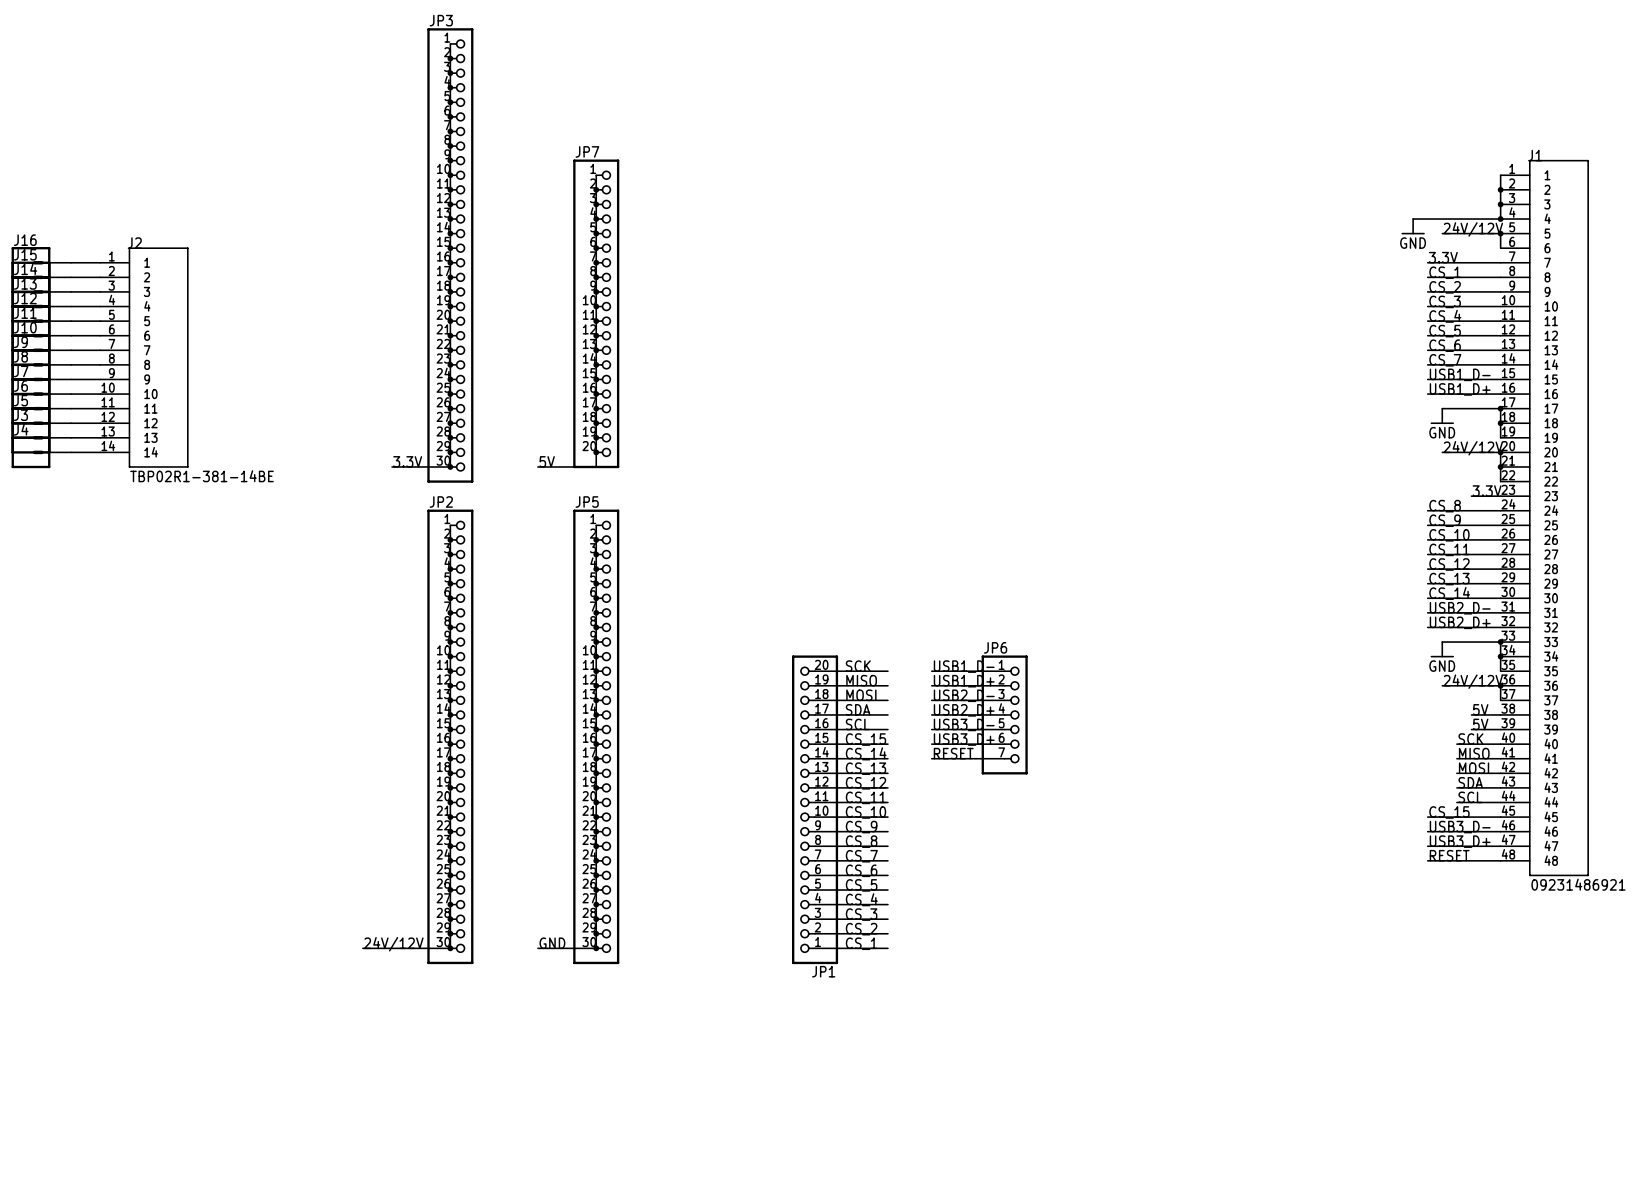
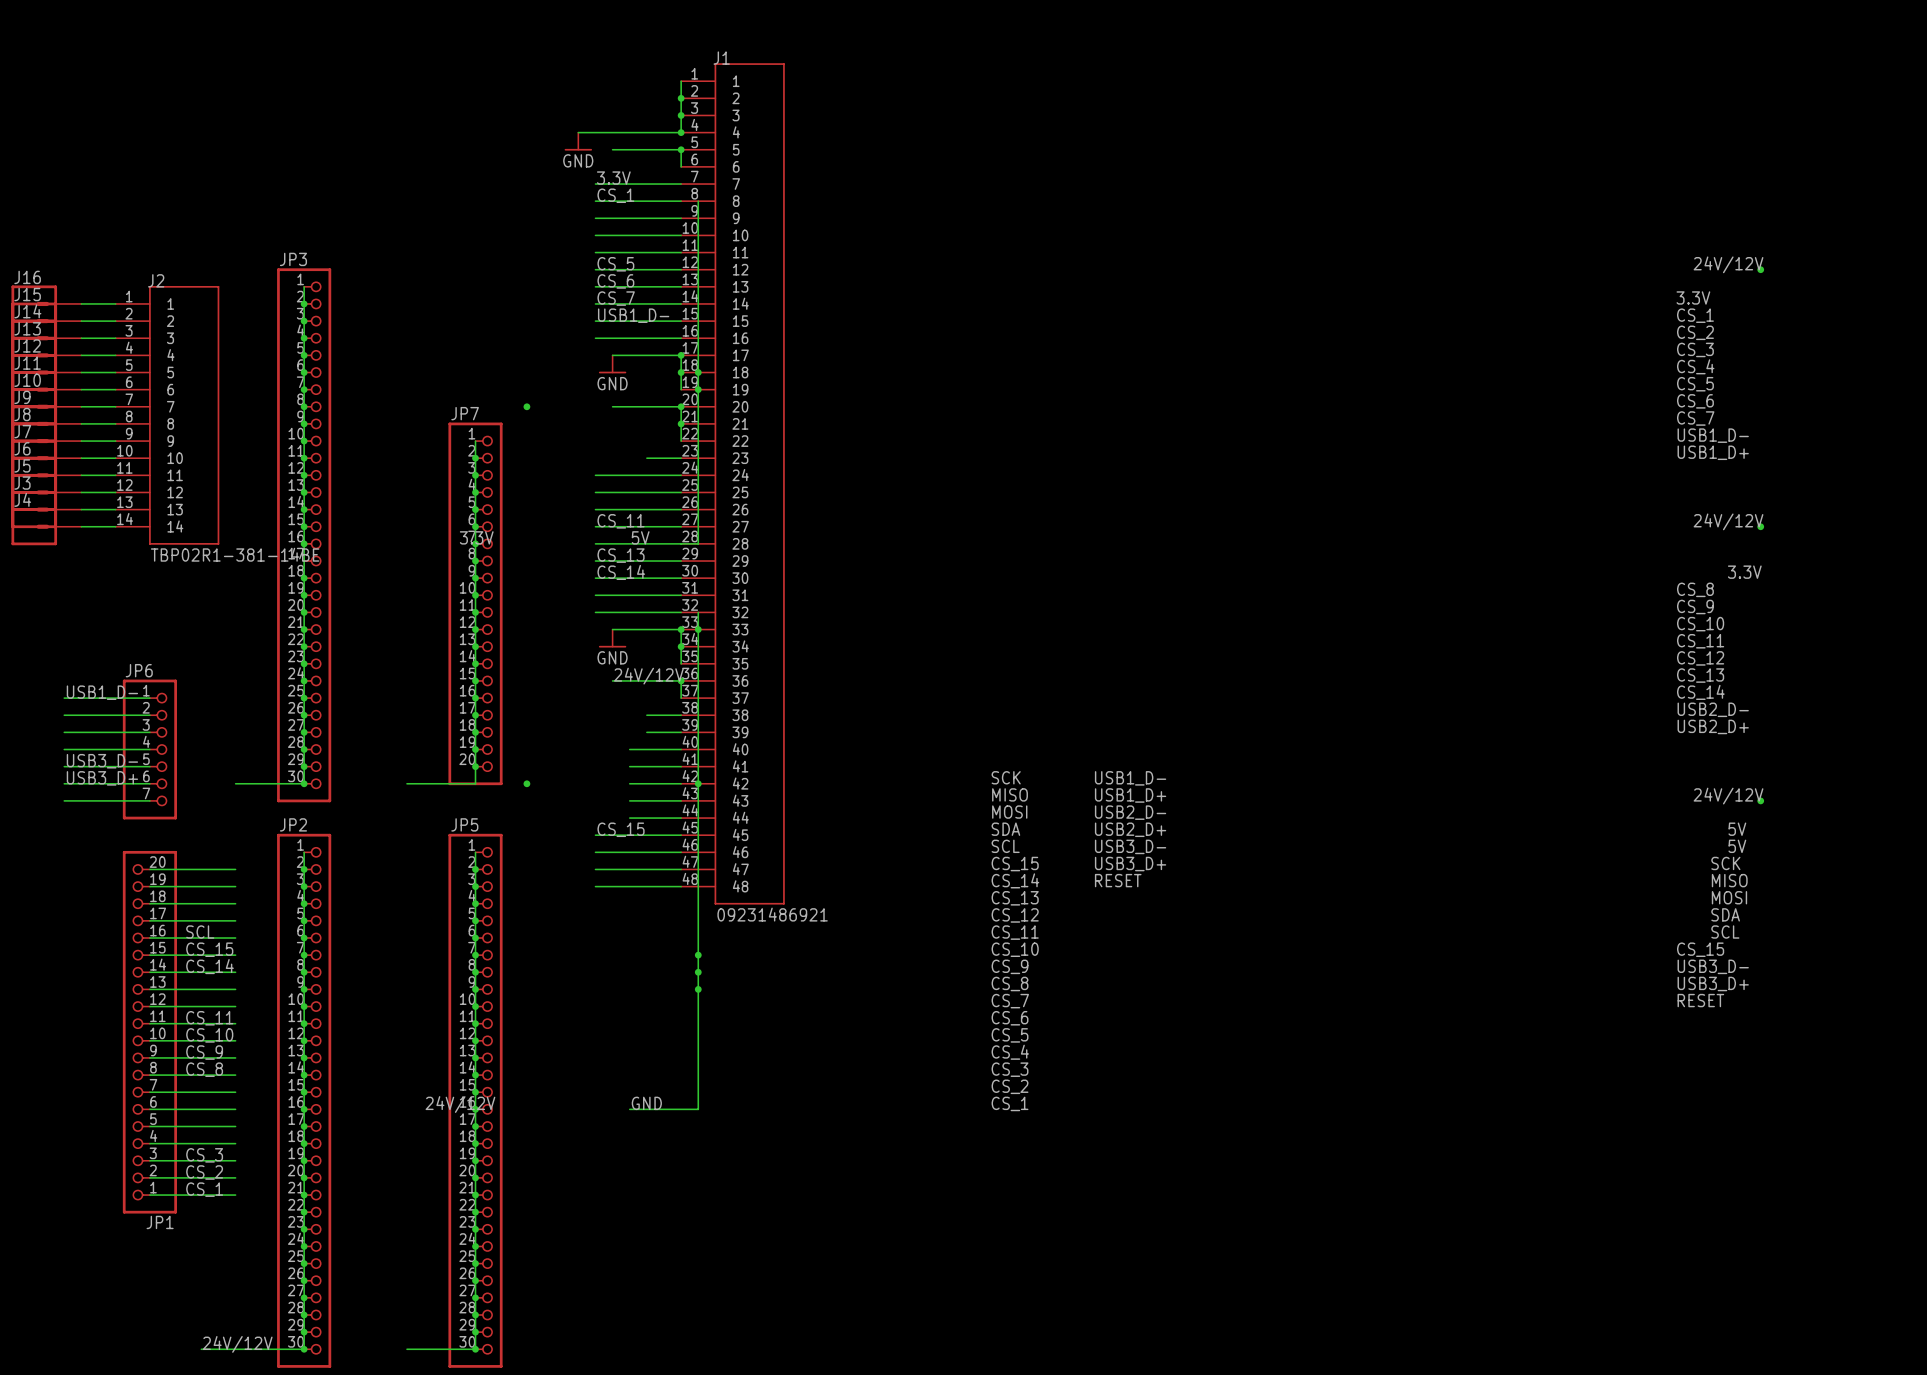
wire: (450, 43) (450, 466) (392, 466) -> none
junction: (450, 58) -> none
junction: (450, 73) -> none
wire: none -> (681, 81) (681, 132) (578, 132)
junction: (450, 87) -> none
junction: none -> (681, 98)
junction: (450, 102) -> none
junction: none -> (681, 115)
junction: (450, 116) -> none
junction: none -> (681, 132)
power symbol: none -> GND (578, 141)
junction: (450, 131) -> none
wire: none -> (612, 149) (681, 149) (681, 166)
junction: none -> (681, 149)
junction: (450, 146) -> none
label: none -> 3.3V (613, 178)
junction: (450, 160) -> none
wire: none -> (595, 184) (681, 184)
label: none -> CS_1 (615, 195)
junction: (450, 175) -> none
wire: none -> (595, 201) (681, 201)
wire: (1500, 175) (1500, 219) (1413, 219) -> none
junction: (450, 189) -> none
wire: none -> (595, 218) (681, 218)
junction: (596, 189) -> none
junction: (1500, 189) -> none
junction: (450, 204) -> none
wire: none -> (595, 235) (681, 235)
junction: (596, 204) -> none
junction: (1500, 204) -> none
junction: (450, 219) -> none
wire: none -> (595, 252) (681, 252)
junction: (596, 219) -> none
junction: (1500, 219) -> none
power symbol: GND (1413, 226) -> none
label: none -> CS_5 (615, 264)
junction: (450, 233) -> none
wire: none -> (595, 269) (681, 269)
junction: (596, 233) -> none
wire: (1442, 233) (1500, 233) (1500, 248) -> none
label: none -> CS_6 (615, 281)
wire: none -> (304, 286) (304, 783) (235, 783)
junction: (450, 248) -> none
wire: none -> (595, 286) (681, 286)
junction: (596, 248) -> none
JP3 position: (450, 255) -> (304, 535)
label: none -> CS_7 (616, 298)
junction: none -> (304, 303)
junction: (450, 262) -> none
wire: none -> (595, 303) (681, 303)
junction: (596, 262) -> none
wire: (1427, 262) (1500, 262) -> none
label: none -> USB1_D- (633, 315)
junction: none -> (304, 321)
junction: (450, 277) -> none
wire: none -> (595, 321) (681, 321)
junction: (596, 277) -> none
wire: (1427, 277) (1500, 277) -> none
junction: none -> (304, 338)
junction: (450, 291) -> none
wire: none -> (595, 338) (681, 338)
junction: (596, 291) -> none
wire: (1427, 291) (1500, 291) -> none
junction: none -> (304, 355)
junction: (450, 306) -> none
wire: none -> (612, 355) (681, 355) (681, 389)
junction: none -> (681, 355)
junction: (596, 306) -> none
wire: (1427, 306) (1500, 306) -> none
JP7 position: (596, 313) -> (475, 603)
power symbol: none -> GND (612, 364)
junction: none -> (304, 372)
junction: (450, 321) -> none
junction: none -> (681, 372)
wire: (1427, 321) (1500, 321) -> none
junction: none -> (304, 389)
junction: (450, 335) -> none
wire: (1427, 335) (1500, 335) -> none
junction: none -> (304, 406)
wire: none -> (612, 406) (681, 406) (681, 441)
junction: none -> (681, 406)
junction: (596, 350) -> none
wire: (1427, 350) (1500, 350) -> none
junction: none -> (304, 423)
junction: (450, 364) -> none
junction: none -> (681, 423)
junction: (596, 364) -> none
wire: (1427, 364) (1500, 364) -> none
junction: none -> (304, 441)
wire: none -> (475, 441) (475, 783) (406, 783)
junction: (450, 379) -> none
junction: (596, 379) -> none
wire: (1427, 379) (1500, 379) -> none
junction: none -> (304, 458)
junction: none -> (475, 458)
junction: (450, 394) -> none
wire: none -> (646, 458) (681, 458)
junction: (596, 394) -> none
wire: (1427, 394) (1500, 394) -> none
junction: none -> (304, 475)
junction: none -> (475, 475)
junction: (450, 408) -> none
wire: none -> (595, 475) (681, 475)
junction: (596, 408) -> none
wire: (1442, 408) (1500, 408) (1500, 437) -> none
junction: (1500, 408) -> none
power symbol: GND (1442, 416) -> none
junction: none -> (304, 492)
junction: none -> (475, 492)
junction: (450, 423) -> none
wire: none -> (595, 492) (681, 492)
junction: (596, 423) -> none
junction: (1500, 423) -> none
junction: none -> (304, 509)
junction: none -> (475, 509)
junction: (450, 437) -> none
wire: none -> (595, 509) (681, 509)
junction: (596, 437) -> none
label: none -> CS_11 (621, 521)
junction: none -> (304, 526)
junction: none -> (475, 526)
junction: (450, 452) -> none
wire: none -> (595, 526) (681, 526)
junction: (596, 452) -> none
wire: (1442, 452) (1500, 452) (1500, 481) -> none
junction: none -> (304, 543)
junction: none -> (475, 543)
junction: (450, 466) -> none
wire: none -> (595, 543) (629, 543)
junction: (1500, 466) -> none
label: none -> CS_13 (621, 555)
junction: none -> (475, 561)
wire: none -> (595, 561) (681, 561)
label: none -> CS_14 (621, 572)
junction: none -> (304, 578)
junction: none -> (475, 578)
wire: none -> (595, 578) (681, 578)
wire: (1471, 496) (1500, 496) -> none
junction: none -> (304, 595)
junction: none -> (475, 595)
wire: none -> (595, 595) (681, 595)
wire: (1427, 510) (1500, 510) -> none
J1 position: (1544, 518) -> (732, 483)
junction: none -> (304, 612)
junction: none -> (475, 612)
wire: (450, 525) (450, 948) (362, 948) -> none
wire: none -> (595, 612) (681, 612)
wire: (1427, 525) (1500, 525) -> none
junction: none -> (304, 629)
junction: none -> (475, 629)
junction: (450, 539) -> none
wire: none -> (612, 629) (681, 629) (681, 663)
junction: none -> (681, 629)
wire: (1427, 539) (1500, 539) -> none
power symbol: none -> GND (612, 638)
junction: none -> (304, 646)
junction: none -> (475, 646)
junction: (450, 554) -> none
junction: none -> (681, 646)
junction: (596, 554) -> none
wire: (1427, 554) (1500, 554) -> none
junction: none -> (304, 663)
junction: none -> (475, 663)
junction: (450, 569) -> none
junction: (596, 569) -> none
wire: (1427, 569) (1500, 569) -> none
label: none -> 24V/12V (648, 676)
junction: none -> (304, 680)
junction: none -> (475, 680)
junction: (450, 583) -> none
wire: none -> (612, 680) (681, 680) (681, 698)
junction: none -> (681, 680)
junction: (596, 583) -> none
wire: (1427, 583) (1500, 583) -> none
label: none -> USB1_D- (102, 692)
wire: none -> (64, 698) (149, 698)
junction: none -> (304, 698)
junction: none -> (475, 698)
junction: (450, 598) -> none
junction: (596, 598) -> none
wire: (1427, 598) (1500, 598) -> none
wire: none -> (64, 715) (149, 715)
junction: none -> (304, 715)
junction: none -> (475, 715)
junction: (450, 612) -> none
wire: none -> (646, 715) (681, 715)
junction: (596, 612) -> none
wire: (1427, 612) (1500, 612) -> none
wire: none -> (64, 732) (149, 732)
junction: none -> (304, 732)
junction: none -> (475, 732)
junction: (450, 627) -> none
wire: none -> (646, 732) (681, 732)
junction: (596, 627) -> none
wire: (1427, 627) (1500, 627) -> none
wire: none -> (64, 749) (149, 749)
junction: none -> (304, 749)
junction: none -> (475, 749)
junction: (450, 642) -> none
wire: none -> (629, 749) (681, 749)
junction: (596, 642) -> none
wire: (1442, 642) (1500, 642) (1500, 671) -> none
junction: (1500, 642) -> none
power symbol: GND (1442, 649) -> none
label: none -> USB3_D- (102, 761)
wire: none -> (64, 766) (149, 766)
junction: none -> (304, 766)
junction: none -> (475, 766)
junction: (450, 656) -> none
wire: none -> (629, 766) (681, 766)
junction: (596, 656) -> none
junction: (1500, 656) -> none
label: none -> USB3_D+ (102, 778)
wire: none -> (64, 783) (149, 783)
junction: none -> (304, 783)
wire: none -> (629, 783) (681, 783)
wire: (815, 671) (887, 671) -> none
wire: (931, 671) (1004, 671) -> none
wire: none -> (64, 800) (149, 800)
junction: (450, 685) -> none
wire: none -> (629, 800) (681, 800)
junction: (596, 685) -> none
wire: (815, 685) (887, 685) -> none
wire: (931, 685) (1004, 685) -> none
wire: (1442, 685) (1500, 685) (1500, 700) -> none
junction: (450, 700) -> none
wire: none -> (629, 818) (681, 818)
junction: (596, 700) -> none
wire: (815, 700) (887, 700) -> none
wire: (931, 700) (1004, 700) -> none
label: none -> CS_15 (621, 829)
junction: (450, 714) -> none
wire: none -> (595, 835) (681, 835)
junction: (596, 714) -> none
wire: (815, 714) (887, 714) -> none
wire: (931, 714) (1004, 714) -> none
JP6 position: (1004, 714) -> (149, 749)
wire: (1471, 714) (1500, 714) -> none
wire: none -> (304, 852) (304, 1349) (201, 1349)
wire: none -> (475, 852) (475, 1349) (406, 1349)
junction: (450, 729) -> none
wire: none -> (595, 852) (681, 852)
junction: (596, 729) -> none
wire: (815, 729) (887, 729) -> none
wire: (931, 729) (1004, 729) -> none
wire: (1471, 729) (1500, 729) -> none
JP2 position: (450, 736) -> (304, 1100)
JP5 position: (596, 736) -> (475, 1100)
wire: none -> (149, 869) (235, 869)
junction: none -> (304, 869)
junction: none -> (475, 869)
junction: (450, 744) -> none
wire: none -> (595, 869) (681, 869)
junction: (596, 744) -> none
wire: (815, 744) (887, 744) -> none
wire: (931, 744) (1004, 744) -> none
wire: (1456, 744) (1500, 744) -> none
wire: none -> (149, 886) (235, 886)
junction: none -> (304, 886)
junction: none -> (475, 886)
junction: (450, 758) -> none
wire: none -> (595, 886) (681, 886)
junction: (596, 758) -> none
wire: (815, 758) (887, 758) -> none
wire: (931, 758) (1004, 758) -> none
wire: (1456, 758) (1500, 758) -> none
wire: none -> (149, 903) (235, 903)
junction: none -> (304, 903)
junction: none -> (475, 903)
junction: (450, 773) -> none
junction: (596, 773) -> none
wire: (815, 773) (887, 773) -> none
wire: (1456, 773) (1500, 773) -> none
wire: none -> (149, 920) (235, 920)
junction: none -> (304, 920)
junction: none -> (475, 920)
junction: (450, 787) -> none
junction: (596, 787) -> none
wire: (815, 787) (887, 787) -> none
wire: (1456, 787) (1500, 787) -> none
label: none -> SCL (200, 932)
wire: none -> (149, 938) (235, 938)
junction: none -> (304, 938)
junction: none -> (475, 938)
junction: (450, 802) -> none
junction: (596, 802) -> none
wire: (815, 802) (887, 802) -> none
wire: (1456, 802) (1500, 802) -> none
JP1 position: (815, 809) -> (149, 1032)
label: none -> CS_15 (209, 949)
wire: none -> (149, 955) (235, 955)
junction: none -> (304, 955)
junction: none -> (475, 955)
junction: (450, 817) -> none
wire: (815, 817) (887, 817) -> none
wire: (1427, 817) (1500, 817) -> none
label: none -> CS_14 (210, 966)
wire: none -> (149, 972) (235, 972)
junction: none -> (304, 972)
junction: none -> (475, 972)
junction: (450, 831) -> none
wire: (815, 831) (887, 831) -> none
wire: (1427, 831) (1500, 831) -> none
wire: none -> (149, 989) (235, 989)
junction: none -> (304, 989)
junction: none -> (475, 989)
junction: (450, 846) -> none
wire: (815, 846) (887, 846) -> none
wire: (1427, 846) (1500, 846) -> none
wire: none -> (149, 1006) (235, 1006)
junction: none -> (304, 1006)
junction: none -> (475, 1006)
junction: (450, 860) -> none
junction: (596, 860) -> none
wire: (815, 860) (887, 860) -> none
wire: (1427, 860) (1500, 860) -> none
label: none -> CS_11 (209, 1018)
wire: none -> (149, 1023) (235, 1023)
junction: none -> (304, 1023)
junction: none -> (475, 1023)
junction: (450, 875) -> none
junction: (596, 875) -> none
wire: (815, 875) (887, 875) -> none
label: none -> CS_10 (209, 1035)
wire: none -> (149, 1040) (235, 1040)
junction: none -> (304, 1040)
junction: none -> (475, 1040)
junction: (450, 890) -> none
junction: (596, 890) -> none
wire: (815, 890) (887, 890) -> none
label: none -> CS_9 (204, 1052)
wire: none -> (149, 1057) (235, 1057)
junction: none -> (304, 1057)
junction: none -> (475, 1057)
junction: (450, 904) -> none
junction: (596, 904) -> none
wire: (815, 904) (887, 904) -> none
label: none -> CS_8 (204, 1069)
wire: none -> (149, 1075) (235, 1075)
junction: none -> (304, 1075)
junction: none -> (475, 1075)
junction: (450, 919) -> none
junction: (596, 919) -> none
wire: (815, 919) (887, 919) -> none
wire: none -> (149, 1092) (235, 1092)
junction: none -> (304, 1092)
junction: none -> (475, 1092)
junction: (450, 933) -> none
junction: (596, 933) -> none
wire: (815, 933) (887, 933) -> none
wire: none -> (149, 1109) (235, 1109)
junction: none -> (304, 1109)
junction: none -> (475, 1109)
junction: (450, 948) -> none
junction: (596, 948) -> none
wire: (815, 948) (887, 948) -> none
wire: none -> (149, 1126) (235, 1126)
junction: none -> (304, 1126)
junction: none -> (475, 1126)
wire: none -> (149, 1143) (235, 1143)
junction: none -> (304, 1143)
junction: none -> (475, 1143)
label: none -> CS_3 (204, 1155)
wire: none -> (149, 1160) (235, 1160)
junction: none -> (304, 1160)
junction: none -> (475, 1160)
label: none -> CS_2 (204, 1172)
wire: none -> (149, 1177) (235, 1177)
junction: none -> (304, 1177)
junction: none -> (475, 1177)
label: none -> CS_1 (204, 1189)
wire: none -> (149, 1195) (235, 1195)
junction: none -> (304, 1195)
junction: none -> (475, 1195)
junction: none -> (304, 1212)
junction: none -> (475, 1212)
junction: none -> (304, 1229)
junction: none -> (475, 1229)
junction: none -> (304, 1246)
junction: none -> (475, 1246)
junction: none -> (304, 1263)
junction: none -> (475, 1263)
junction: none -> (304, 1280)
junction: none -> (475, 1280)
junction: none -> (304, 1297)
junction: none -> (475, 1297)
junction: none -> (304, 1315)
junction: none -> (475, 1315)
junction: none -> (304, 1332)
junction: none -> (475, 1332)
label: none -> 24V/12V (237, 1344)
junction: none -> (304, 1349)
junction: none -> (475, 1349)

